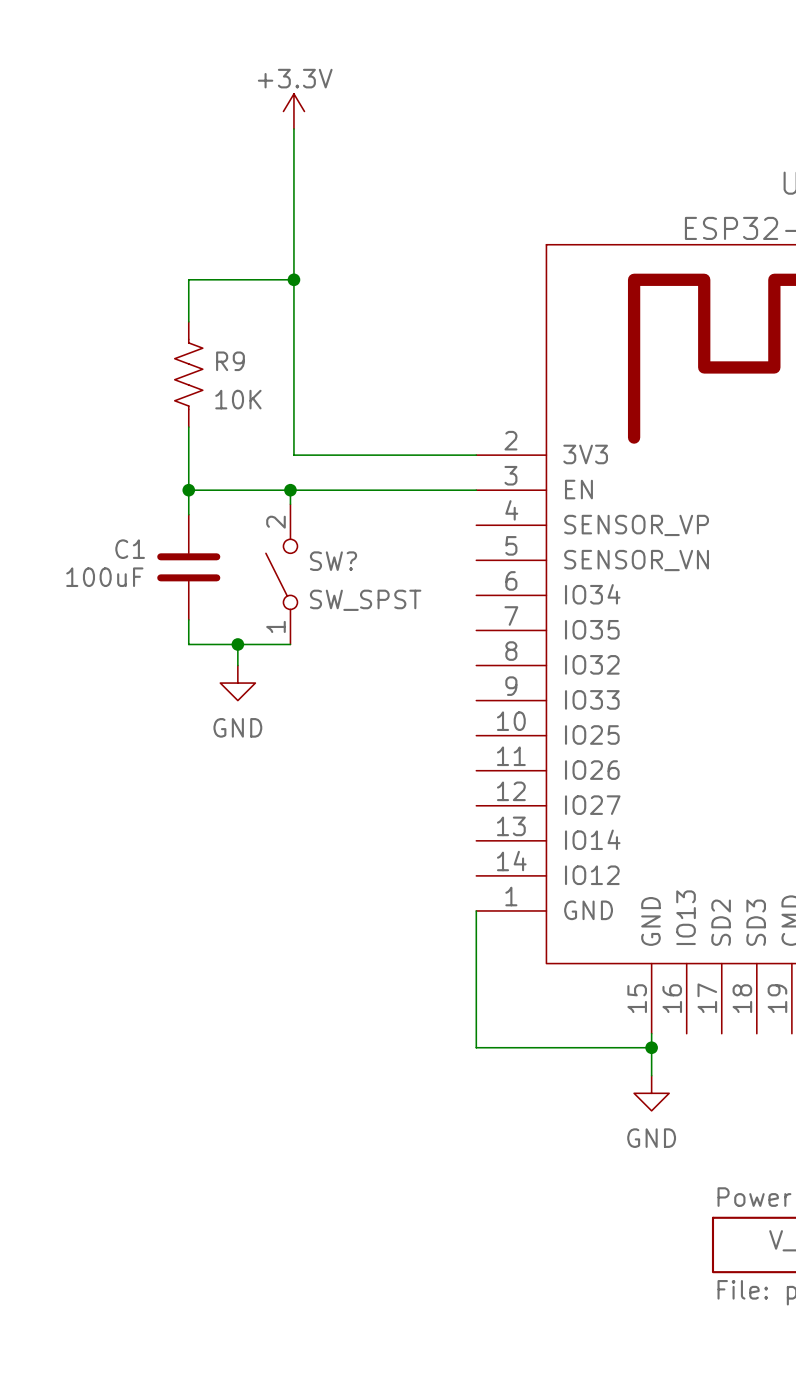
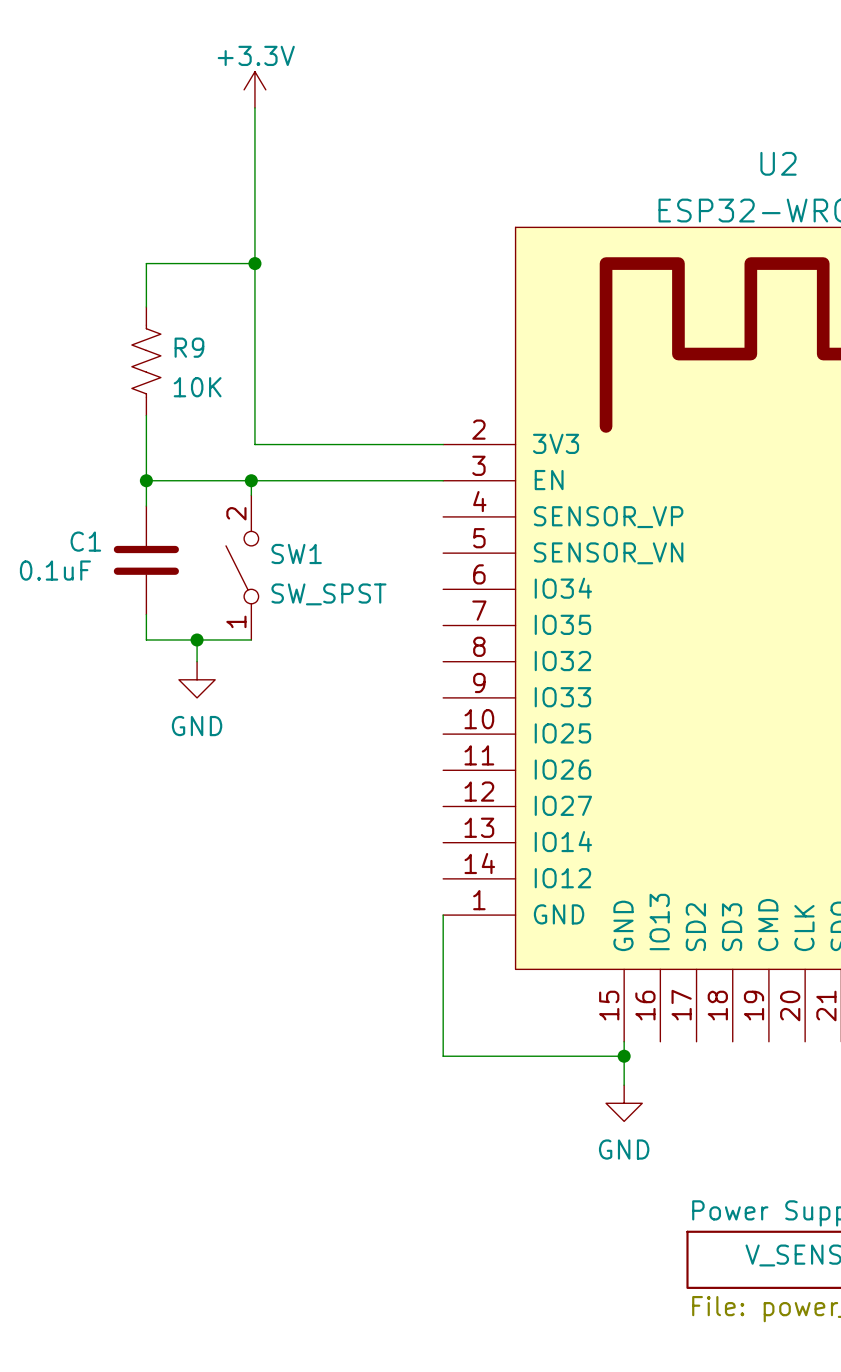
SW? name: SW? (333, 561) -> SW1 (296, 553)
C1 value: 100uF (104, 577) -> 0.1uF (55, 570)

